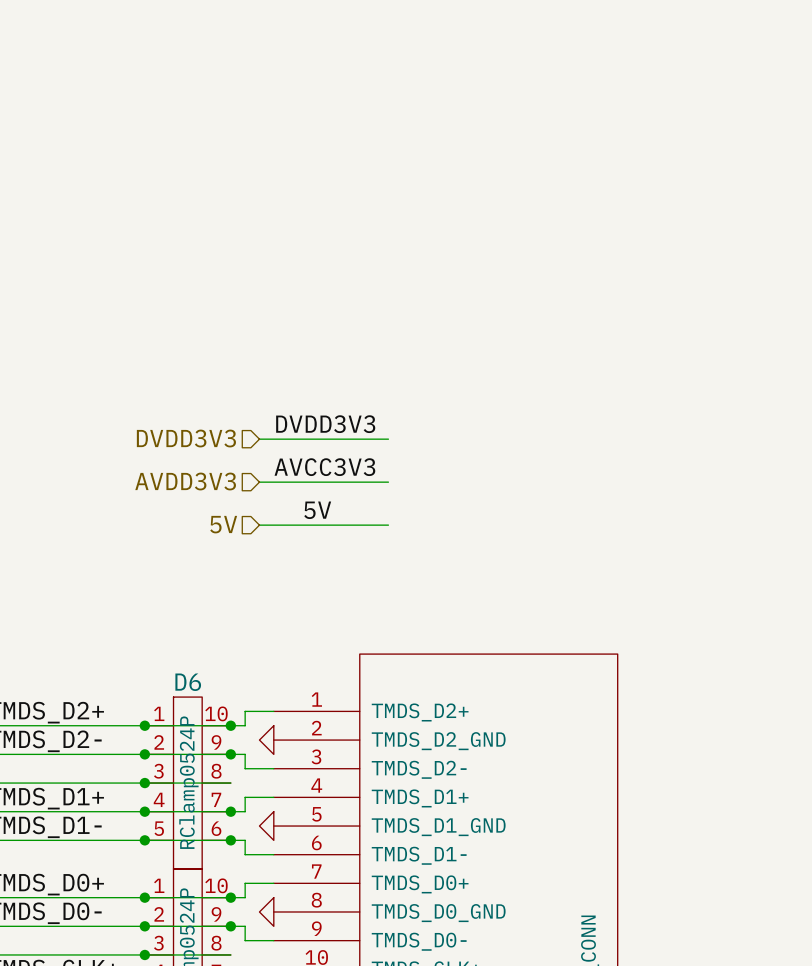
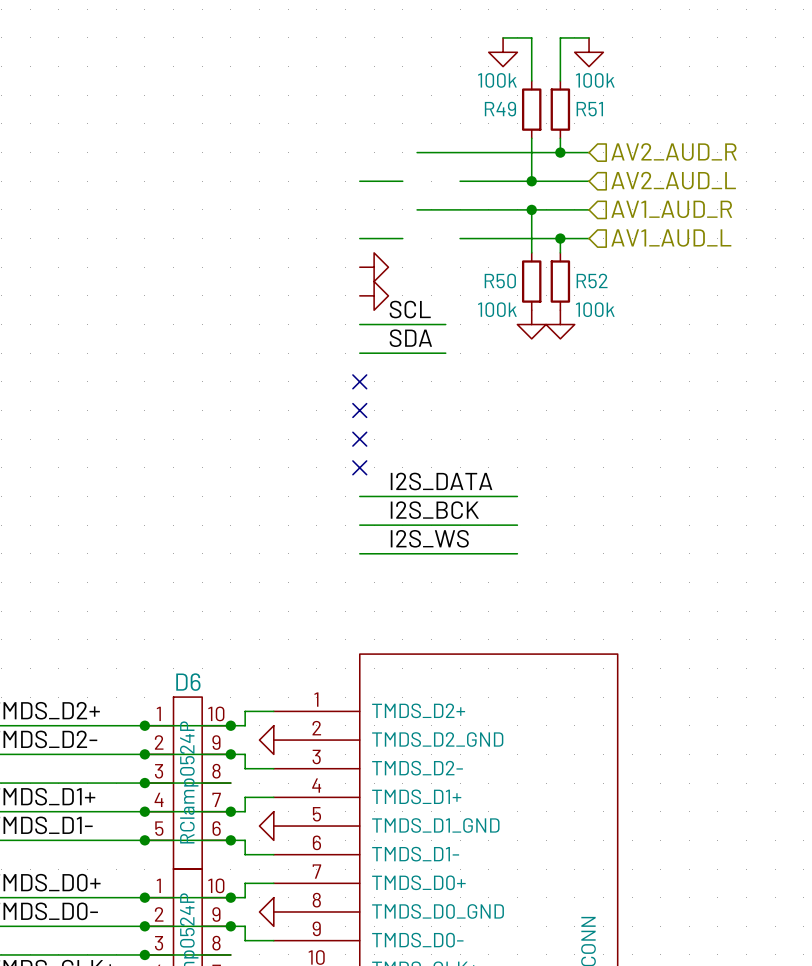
wire: none -> (503, 37) (531, 37) (531, 80)
wire: none -> (589, 37) (560, 37) (560, 80)
power symbol: none -> (503, 52)
power symbol: none -> (589, 52)
R49: none -> 100k (531, 109)
R51: none -> 100k (560, 109)
wire: none -> (531, 138) (531, 181)
wire: none -> (560, 138) (560, 152)
wire: none -> (417, 152) (589, 152)
junction: none -> (560, 152)
hierarchical label: none -> AV2_AUD_R (674, 151)
wire: none -> (359, 181) (402, 181)
wire: none -> (460, 181) (589, 181)
junction: none -> (531, 181)
hierarchical label: none -> AV2_AUD_L (673, 180)
wire: none -> (417, 209) (589, 209)
wire: none -> (531, 209) (531, 252)
junction: none -> (531, 209)
hierarchical label: none -> AV1_AUD_R (671, 209)
wire: none -> (359, 238) (402, 238)
wire: none -> (460, 238) (589, 238)
wire: none -> (560, 238) (560, 252)
junction: none -> (560, 238)
hierarchical label: none -> AV1_AUD_L (671, 238)
power symbol: none -> (374, 267)
R50: none -> 100k (531, 281)
R52: none -> 100k (560, 281)
power symbol: none -> (374, 295)
label: none -> SCL (410, 309)
wire: none -> (359, 324) (445, 324)
power symbol: none -> (531, 324)
power symbol: none -> (560, 324)
label: none -> SDA (410, 338)
wire: none -> (359, 353) (445, 353)
no-connect mark: none -> (359, 381)
no-connect mark: none -> (359, 410)
label: DVDD3V3 (325, 424) -> none
hierarchical label: DVDD3V3 (186, 438) -> none
wire: (259, 439) (388, 439) -> none
no-connect mark: none -> (359, 439)
label: AVCC3V3 (324, 467) -> none
no-connect mark: none -> (359, 467)
hierarchical label: AVDD3V3 (185, 481) -> none
wire: (259, 482) (388, 482) -> (388, 525) (517, 525)
label: none -> I2S_DATA (441, 481)
wire: none -> (359, 496) (517, 496)
label: 5V (317, 510) -> none
label: none -> I2S_BCK (434, 510)
hierarchical label: 5V (223, 524) -> none
wire: (259, 525) (359, 525) -> none
label: none -> I2S_WS (429, 538)
wire: none -> (359, 553) (517, 553)

